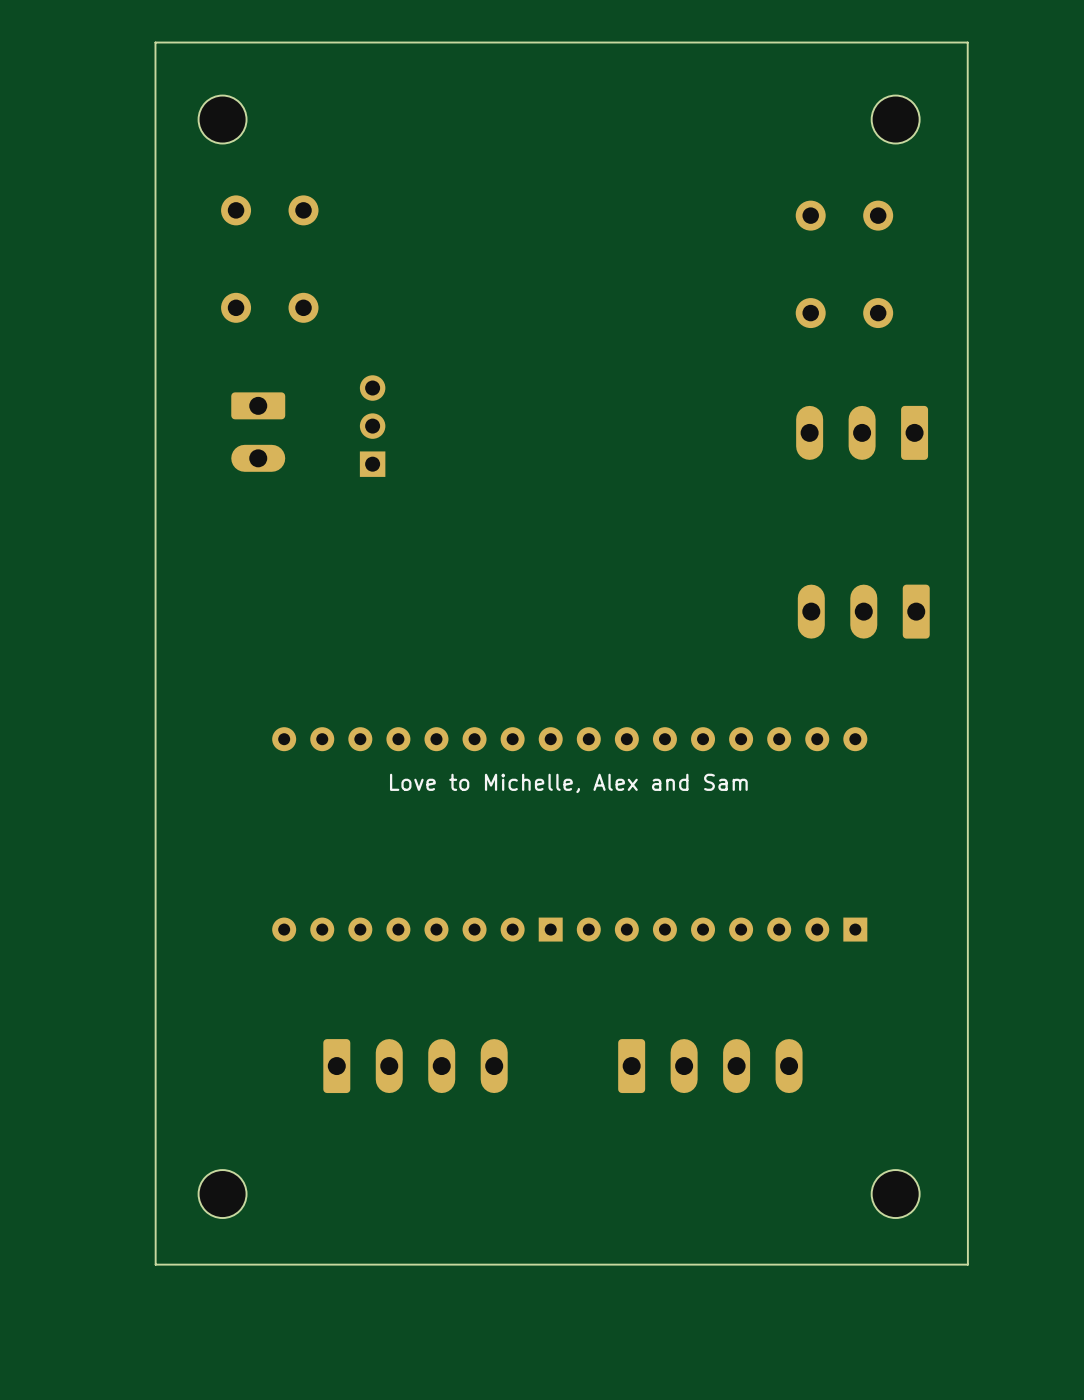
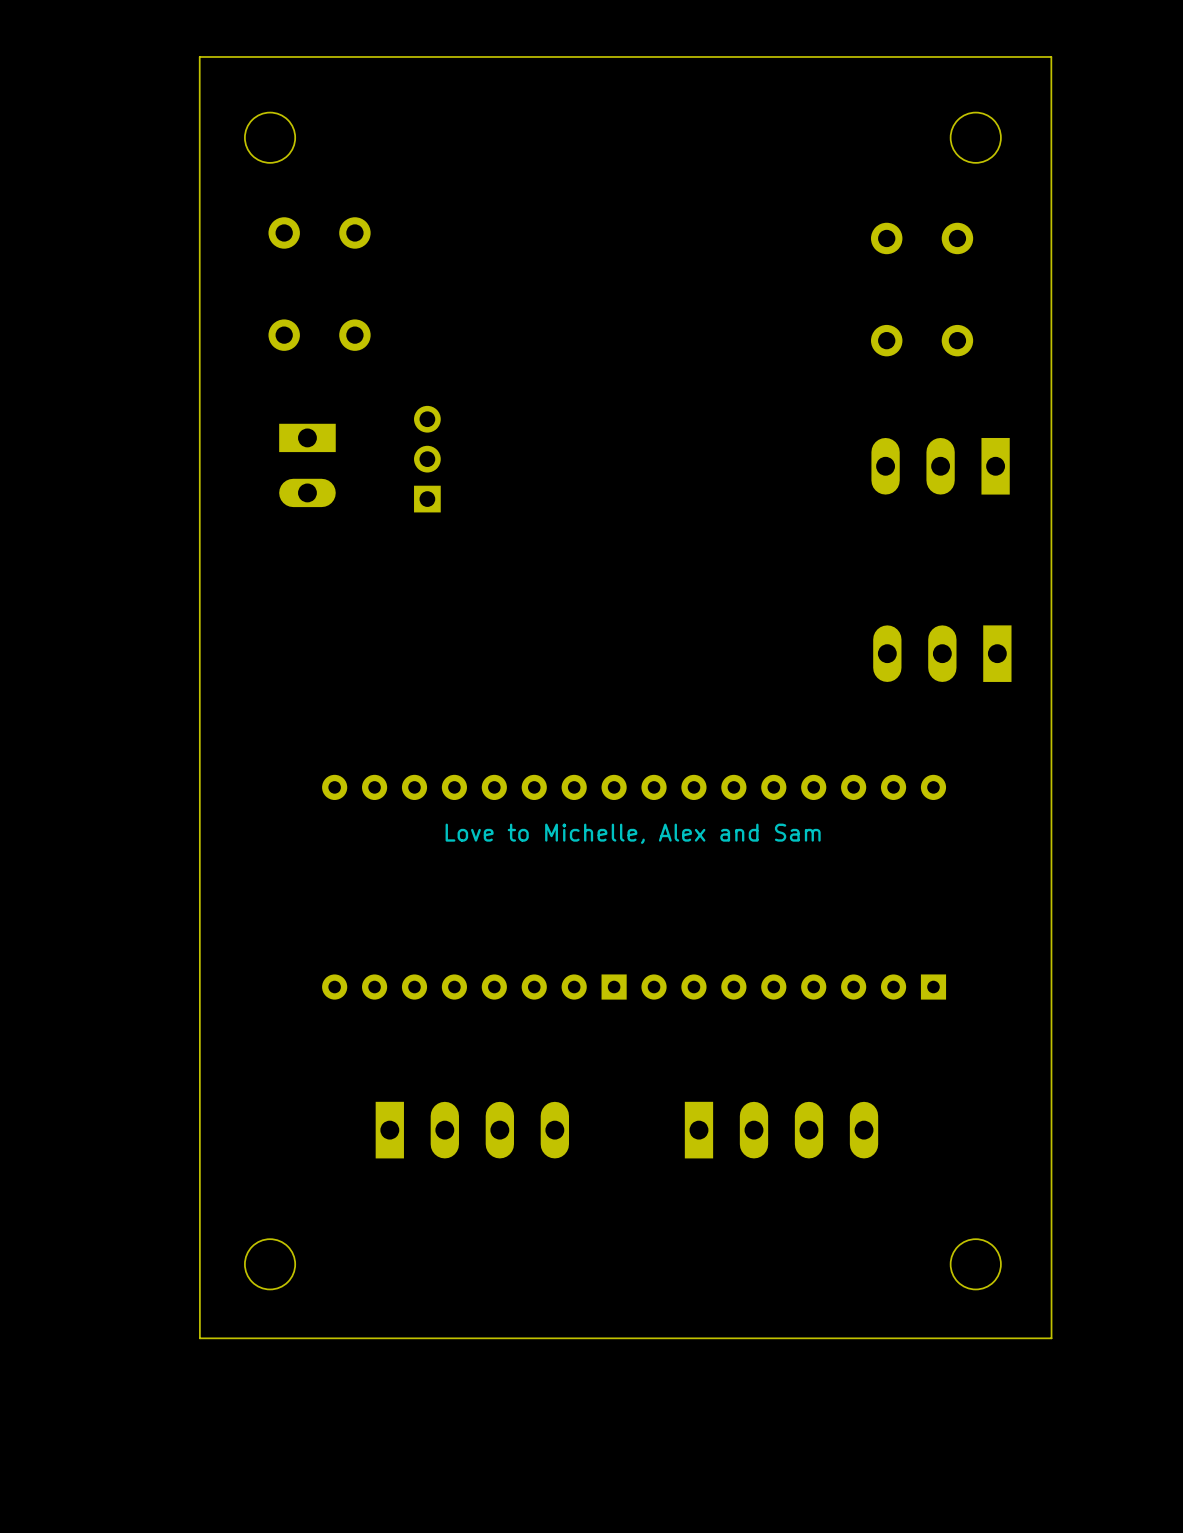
part footprint: [231, 392, 286, 472] -> [279, 423, 336, 508]
part footprint: [796, 405, 929, 460] -> [871, 437, 1010, 495]
part footprint: [797, 584, 930, 639] -> [873, 625, 1012, 682]
part footprint: [323, 1039, 508, 1094] -> [375, 1101, 570, 1159]
part footprint: [618, 1039, 803, 1094] -> [684, 1101, 879, 1159]

